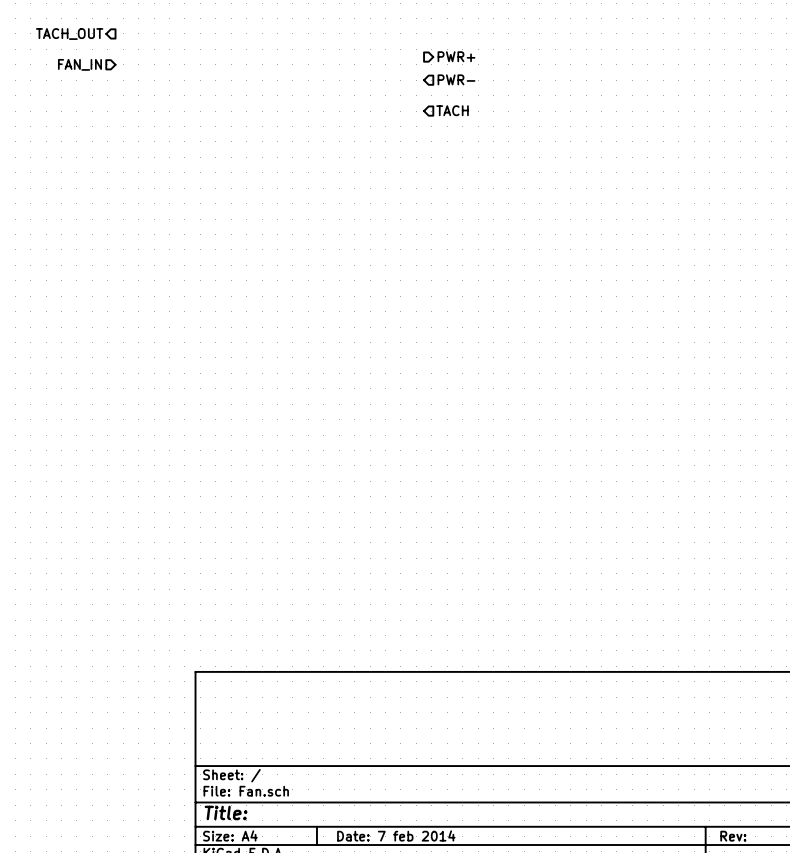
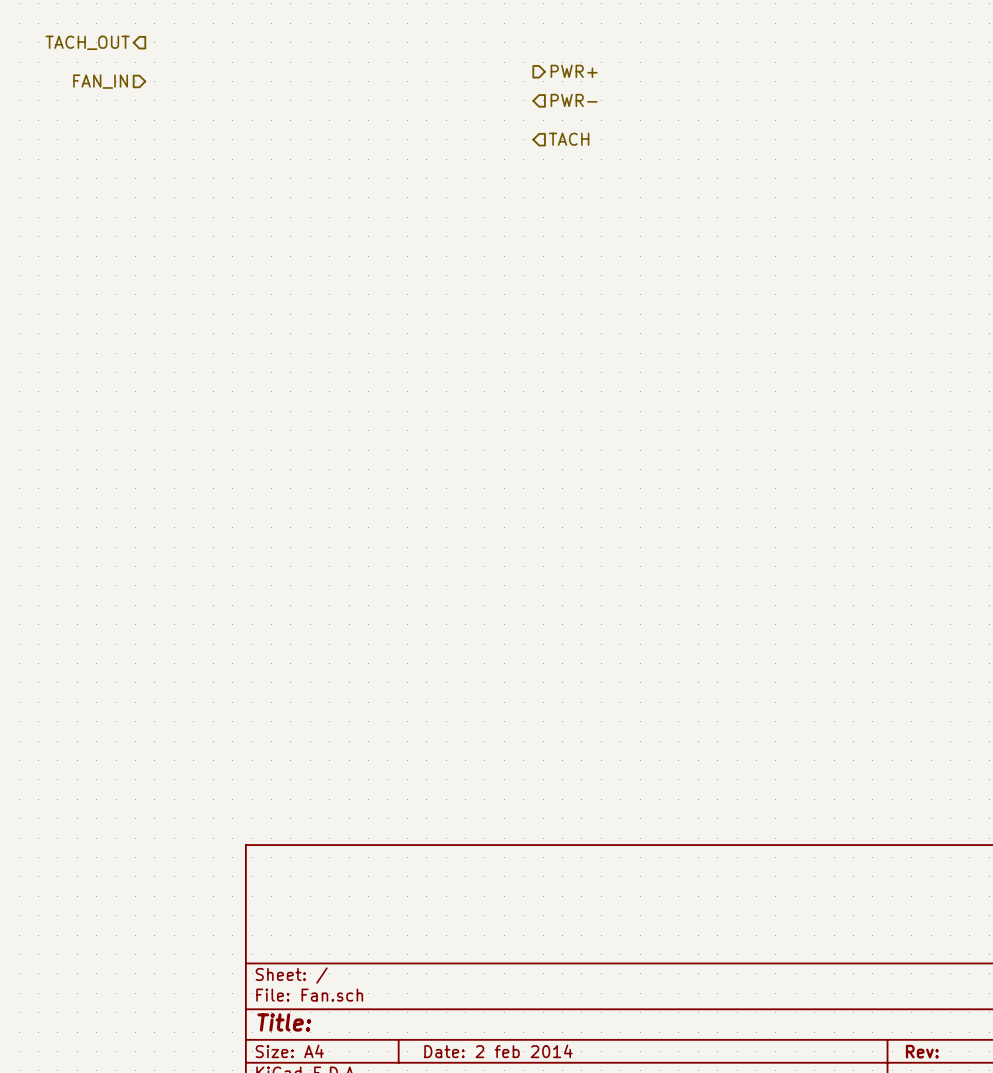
title block: Date: 7 feb 2014 (396, 835) -> Date: 2 feb 2014 (498, 1051)

